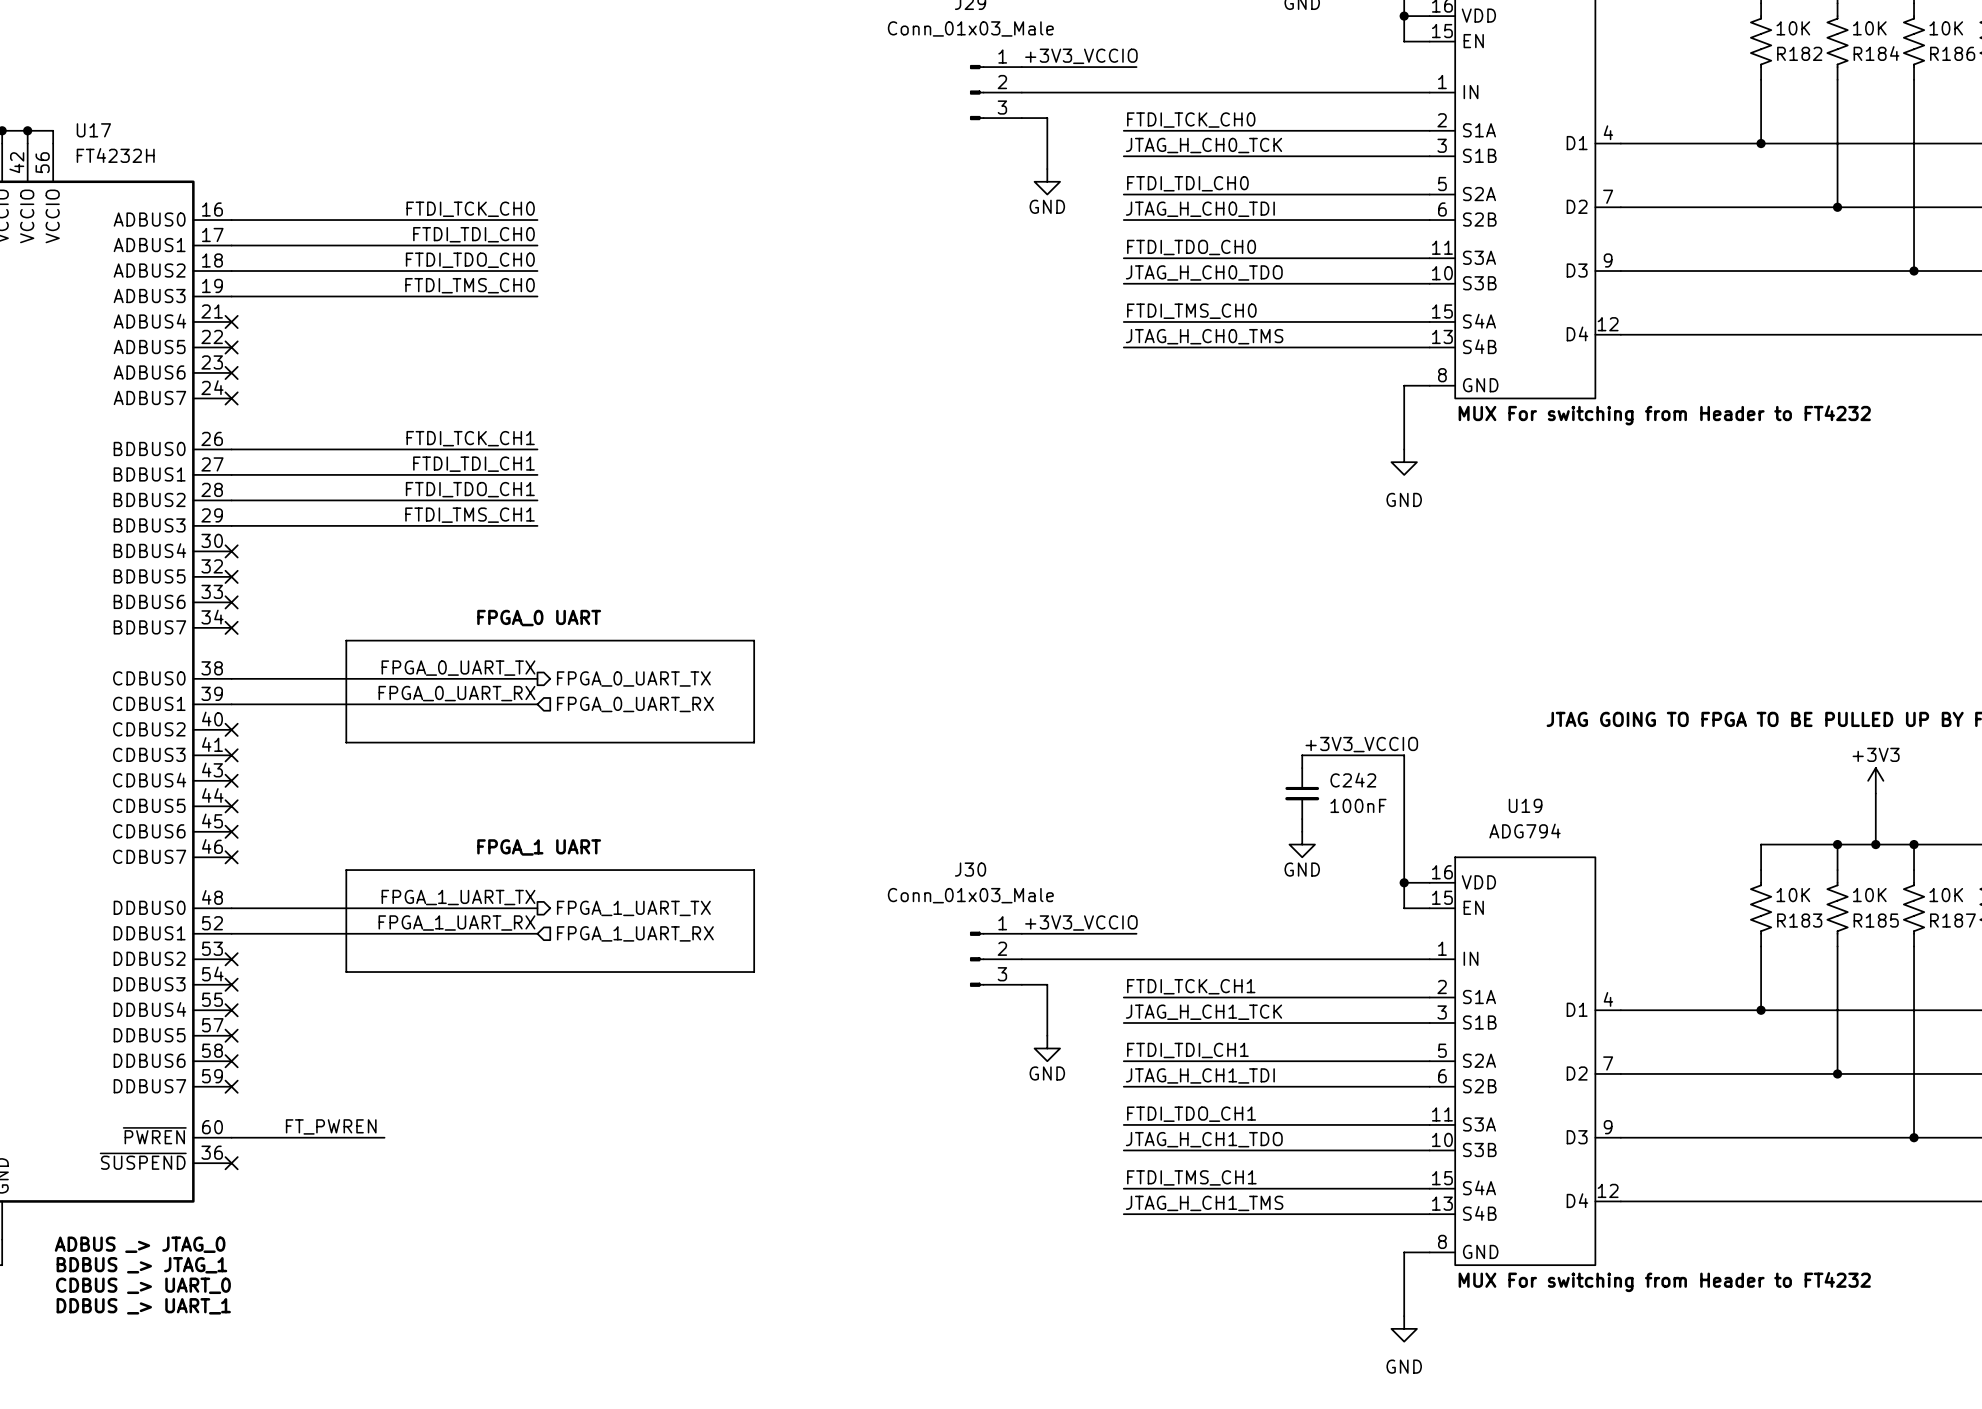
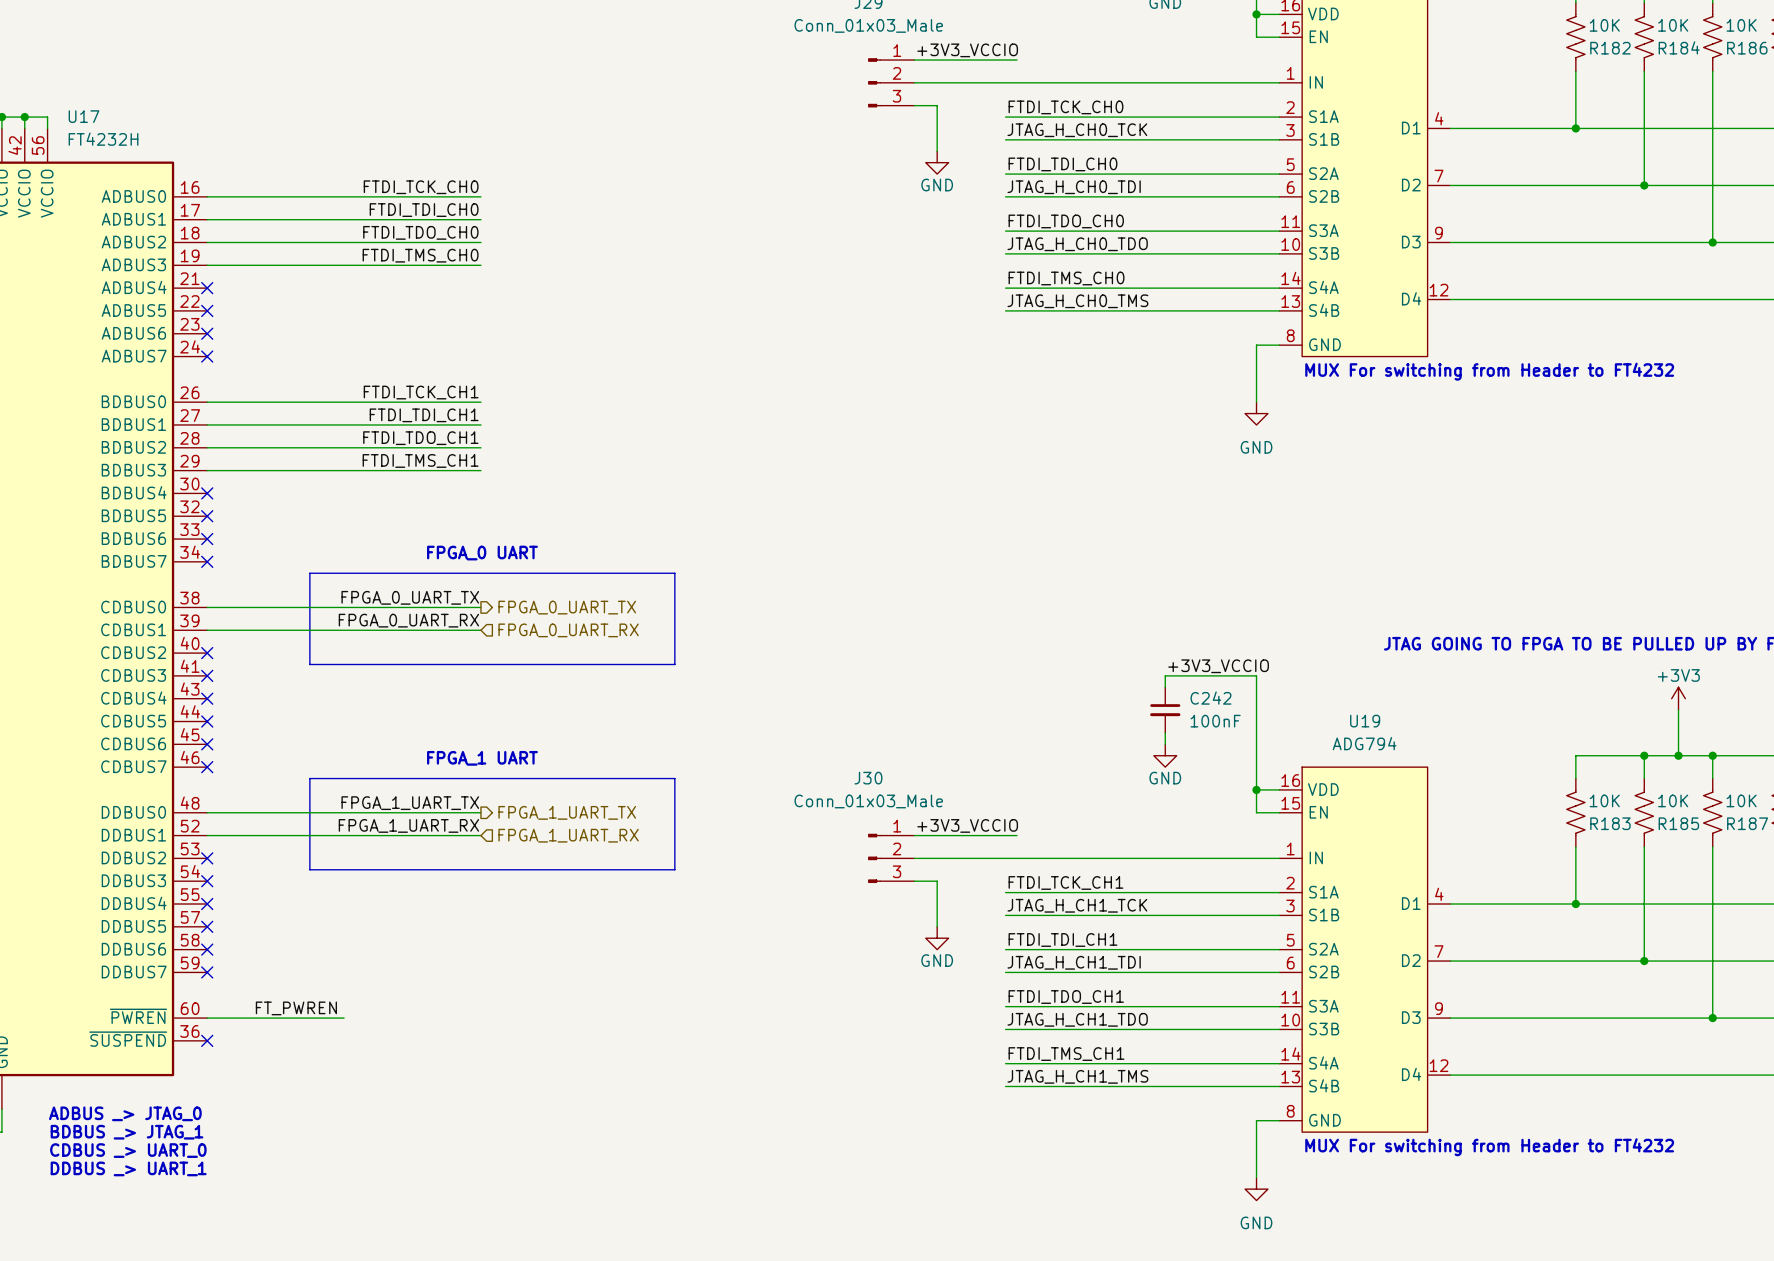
part pin number: 15 (1442, 311) -> 14 (1291, 278)
U19 pin number: 15 (1442, 1178) -> 14 (1291, 1053)

